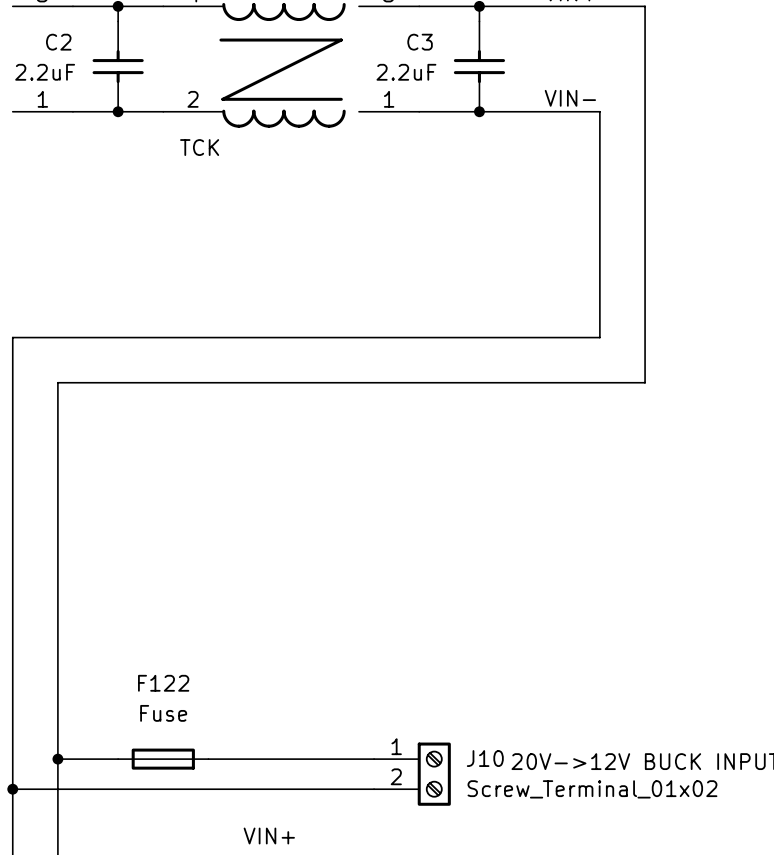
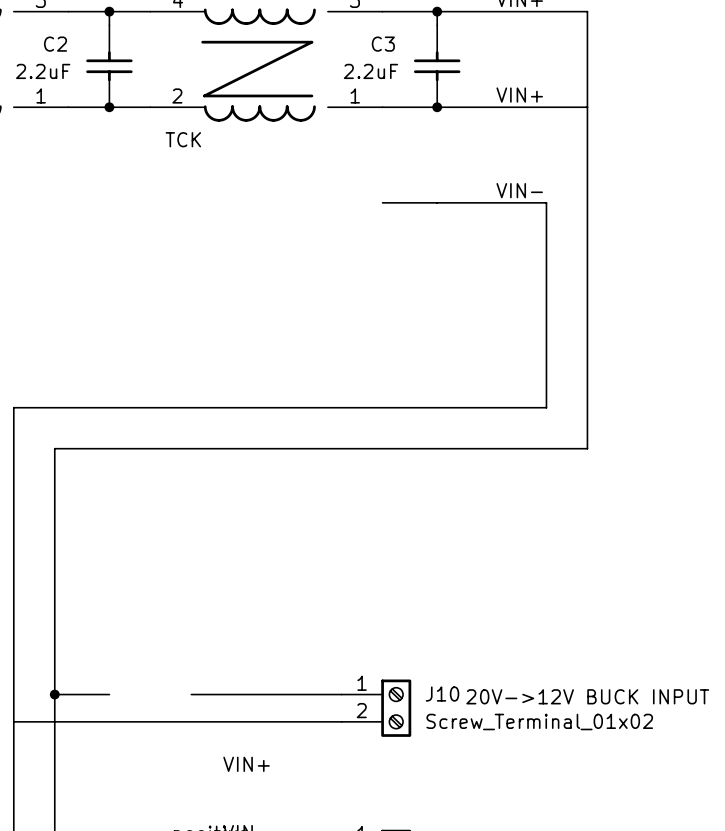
label: VIN- (570, 98) -> VIN+ (519, 95)
wire: (599, 111) (599, 217) -> (546, 107) (587, 107)
label: none -> VIN- (519, 190)
wire: none -> (382, 202) (546, 202)
wire: (599, 337) (12, 337) (12, 442) -> (546, 312) (546, 407) (13, 407)
wire: (645, 382) (57, 382) (57, 488) -> (587, 353) (587, 448) (54, 448)
F122: Fuse (163, 759) -> none
junction: (12, 789) -> none

